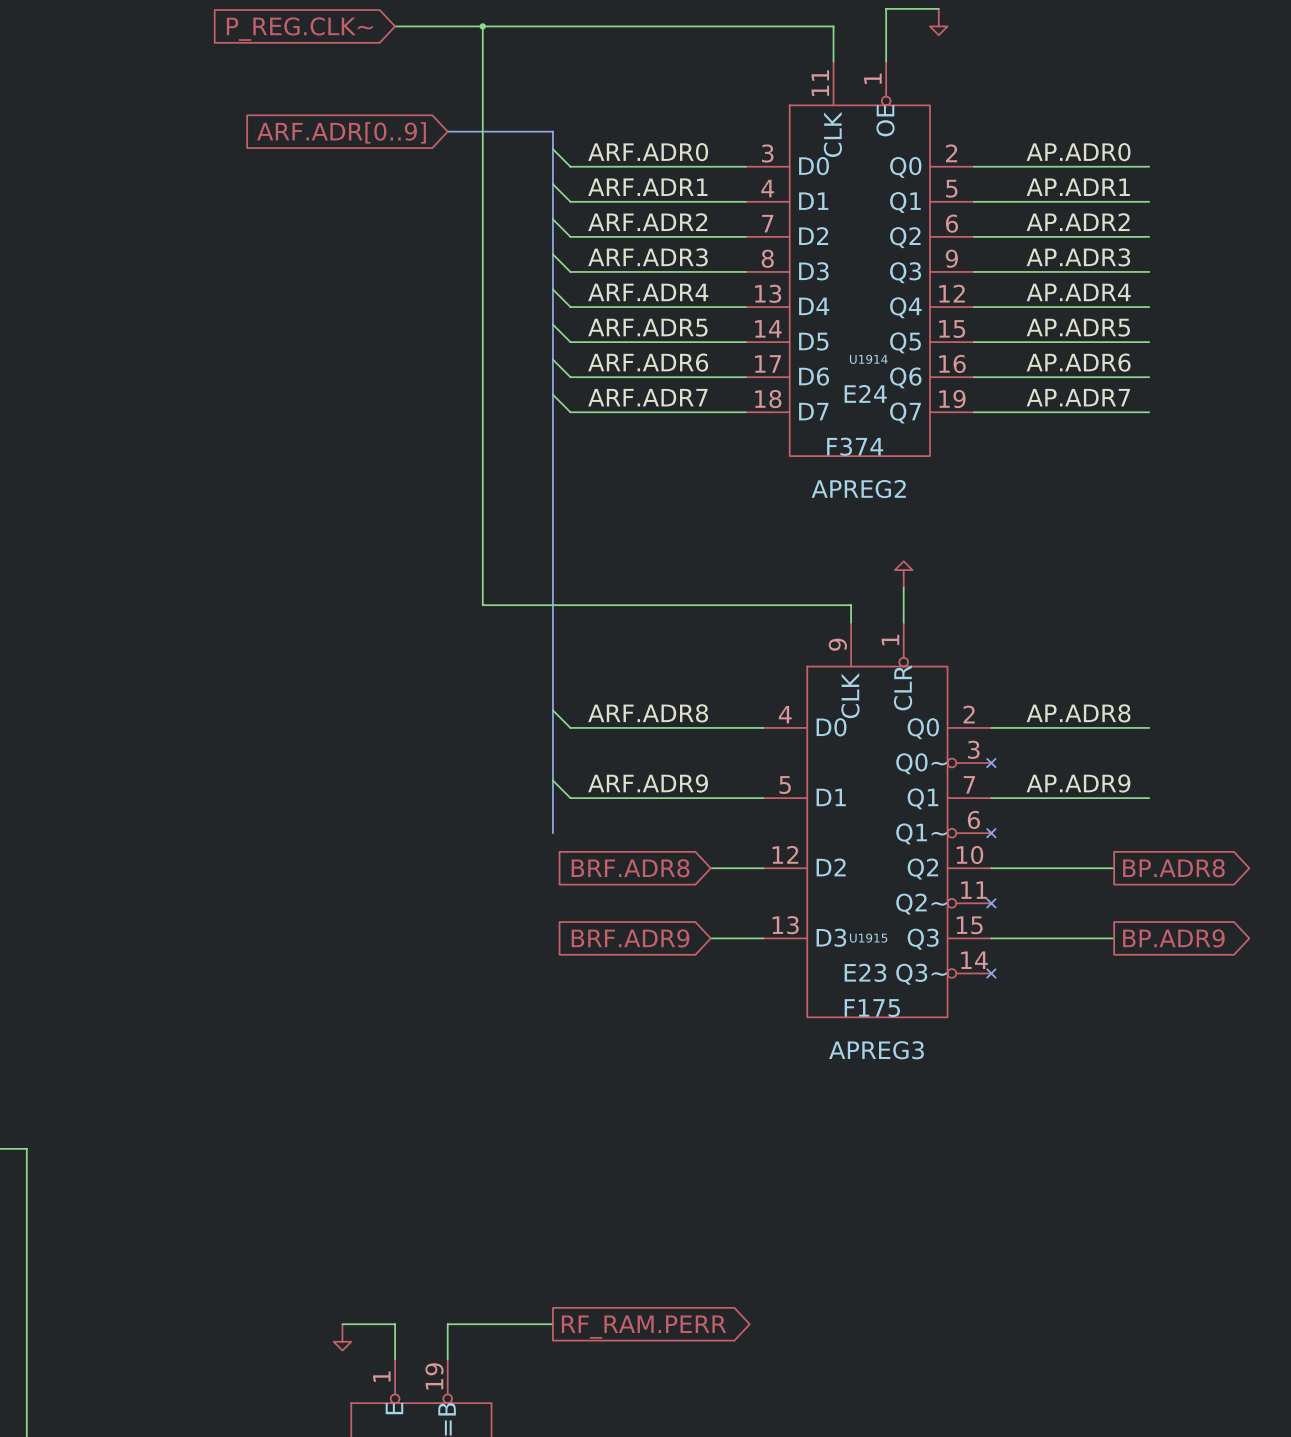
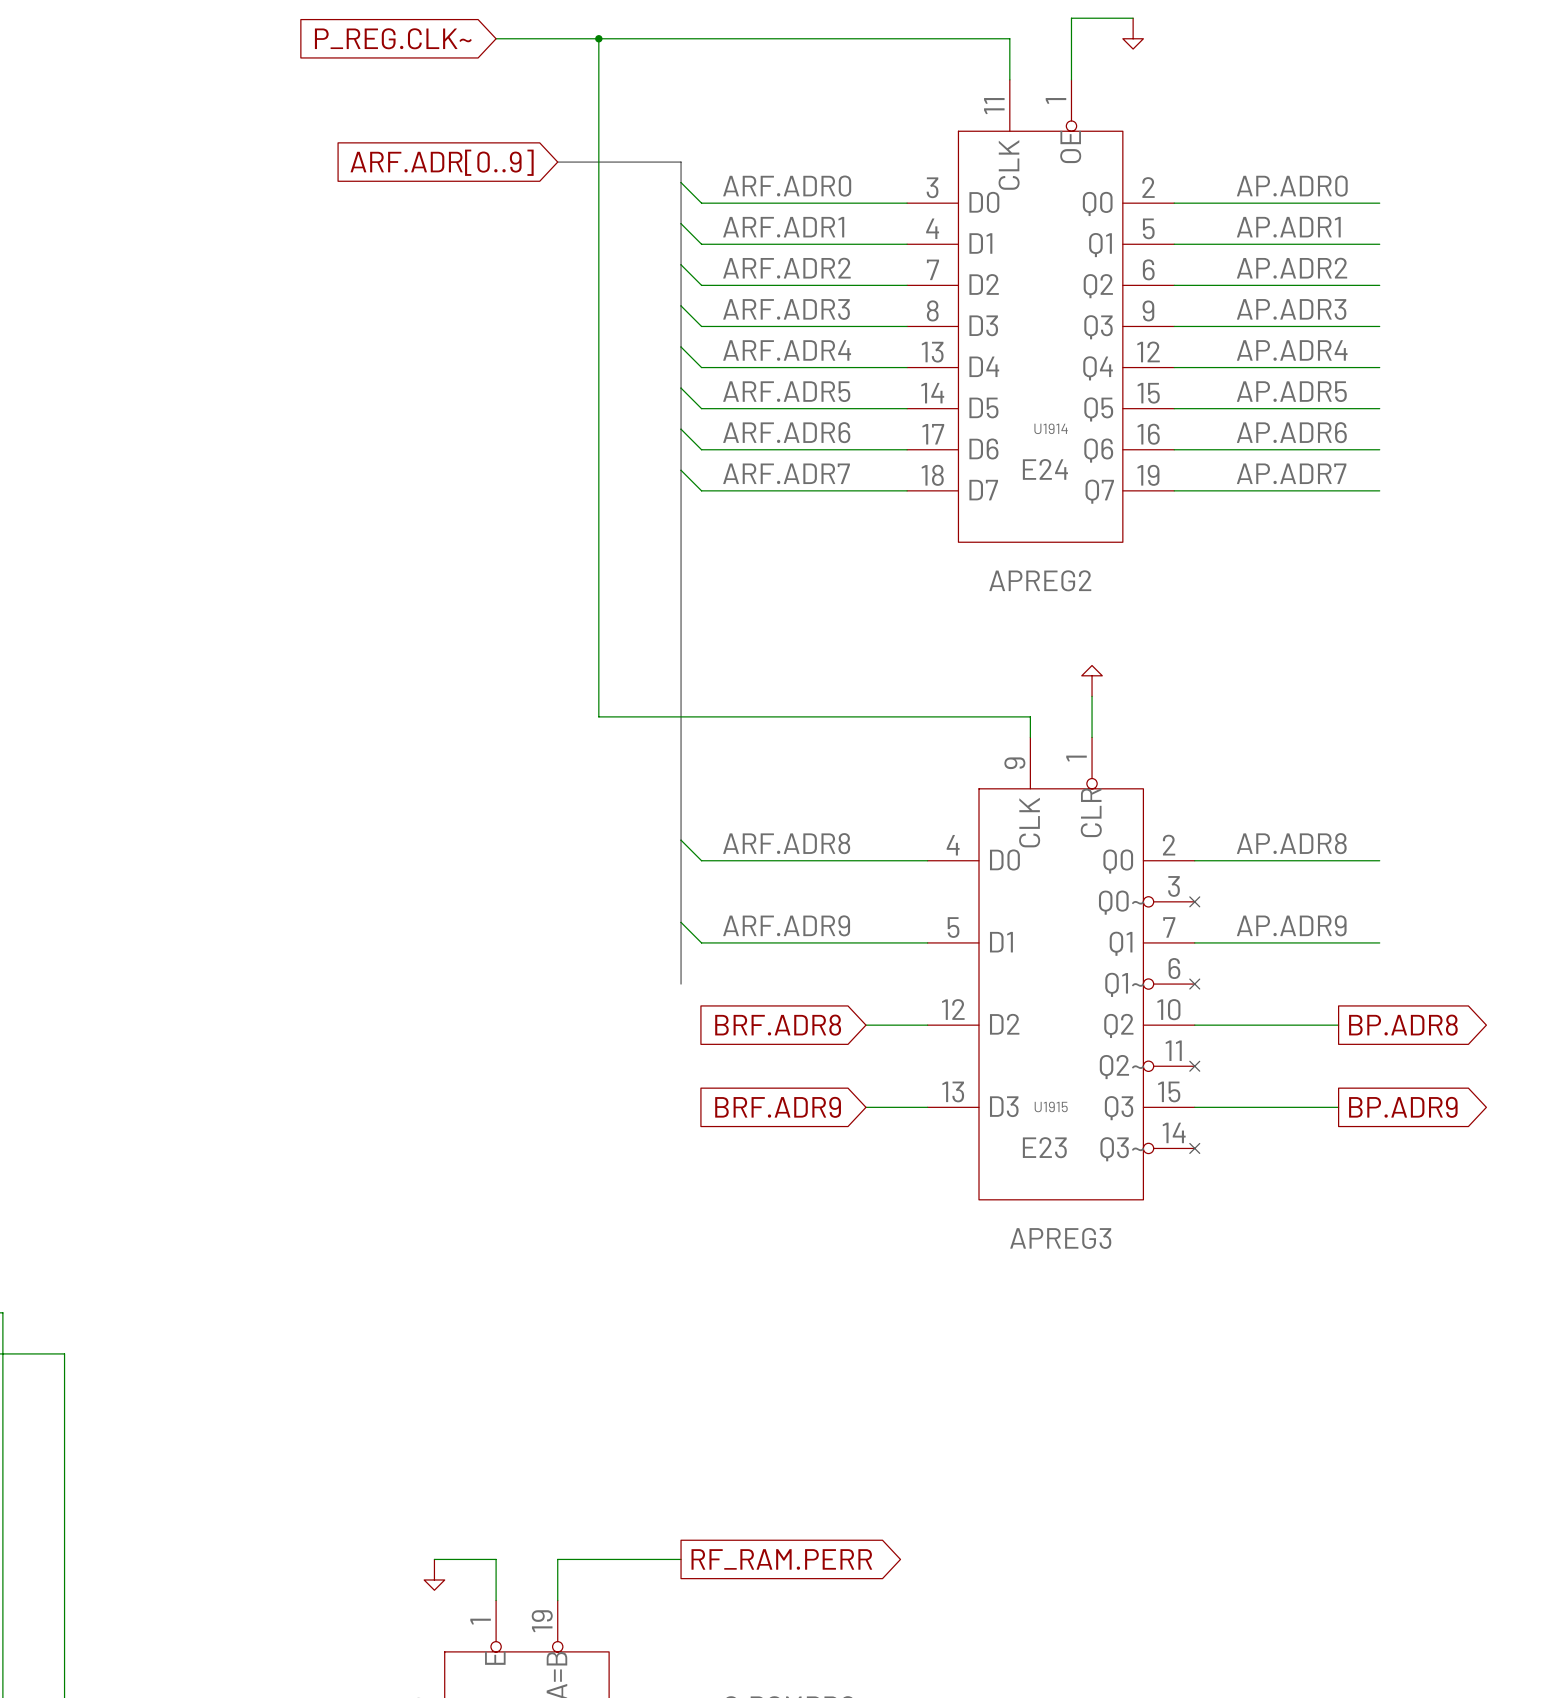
U1914 value: F374 (855, 446) -> none
U1915 value: F175 (872, 1008) -> none

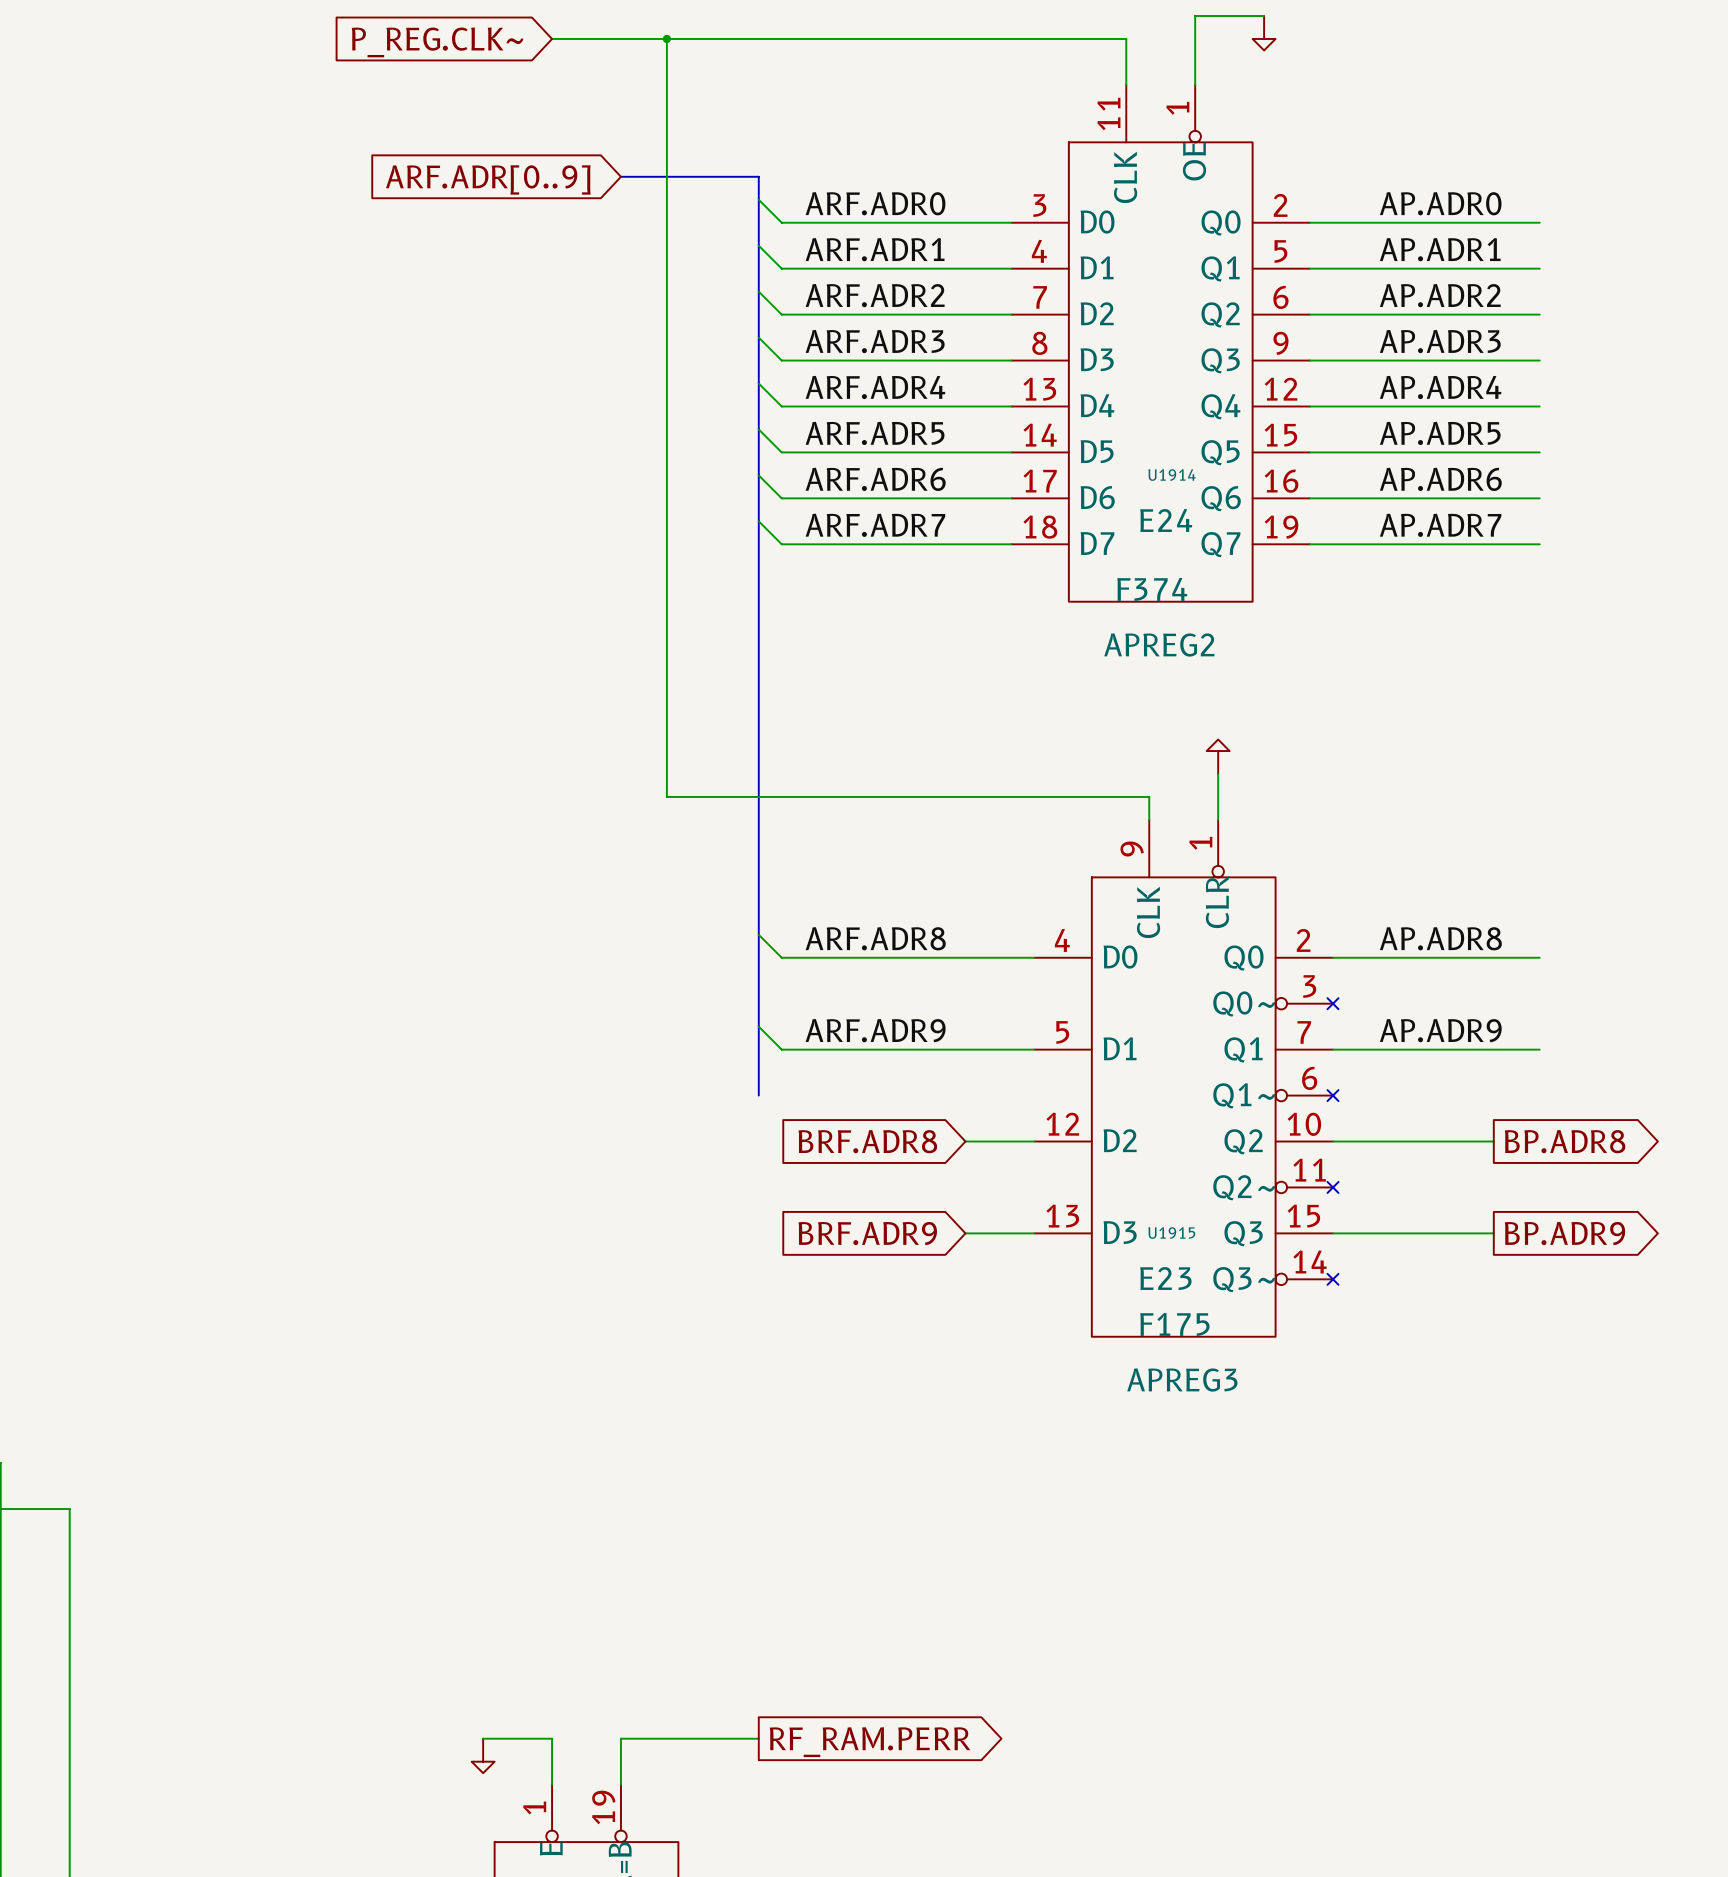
U1914 value: none -> F374 (1152, 589)
U1915 value: none -> F175 (1174, 1324)

